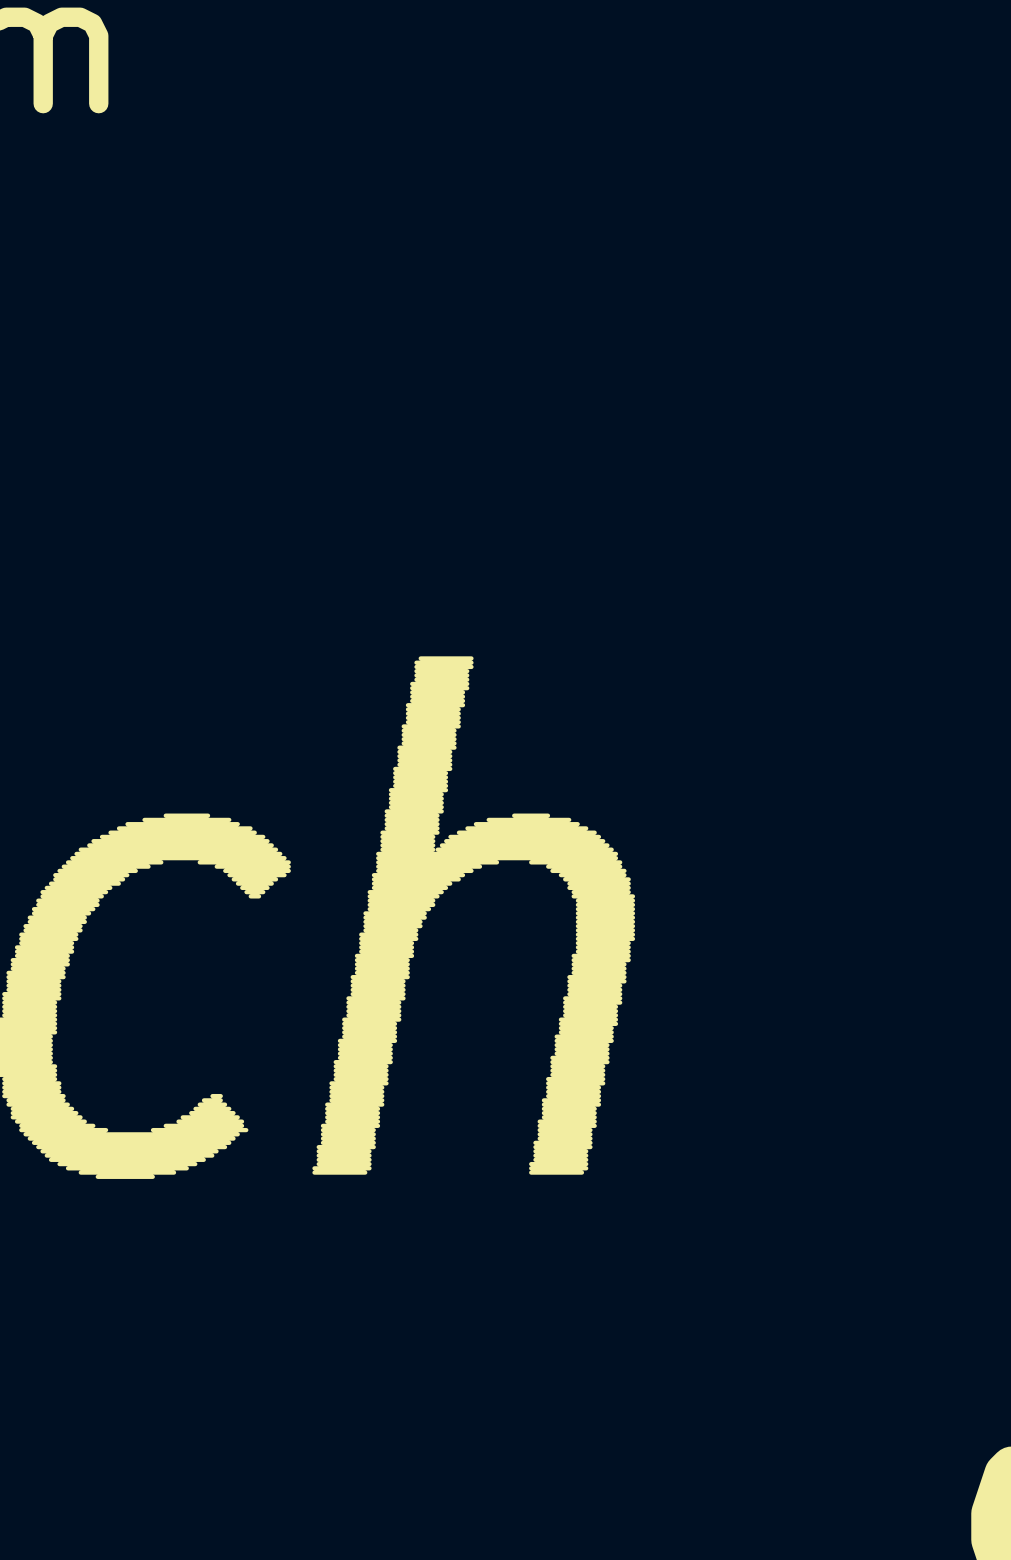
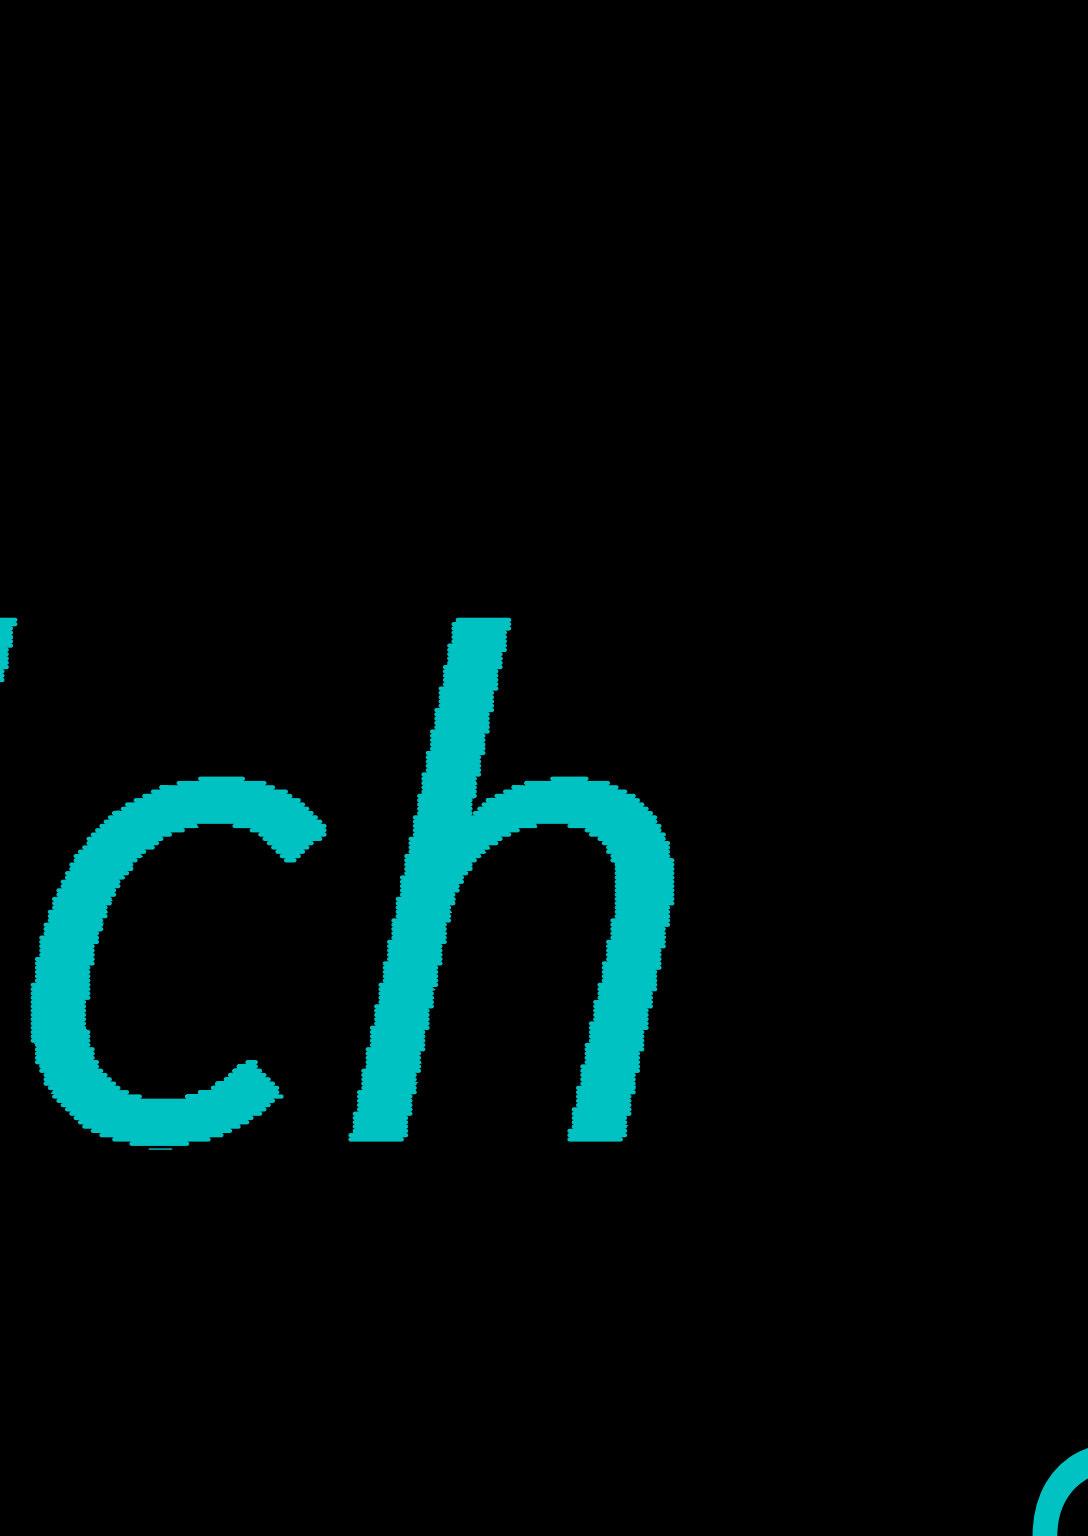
line: none -> (149, 1149) (171, 1149)

